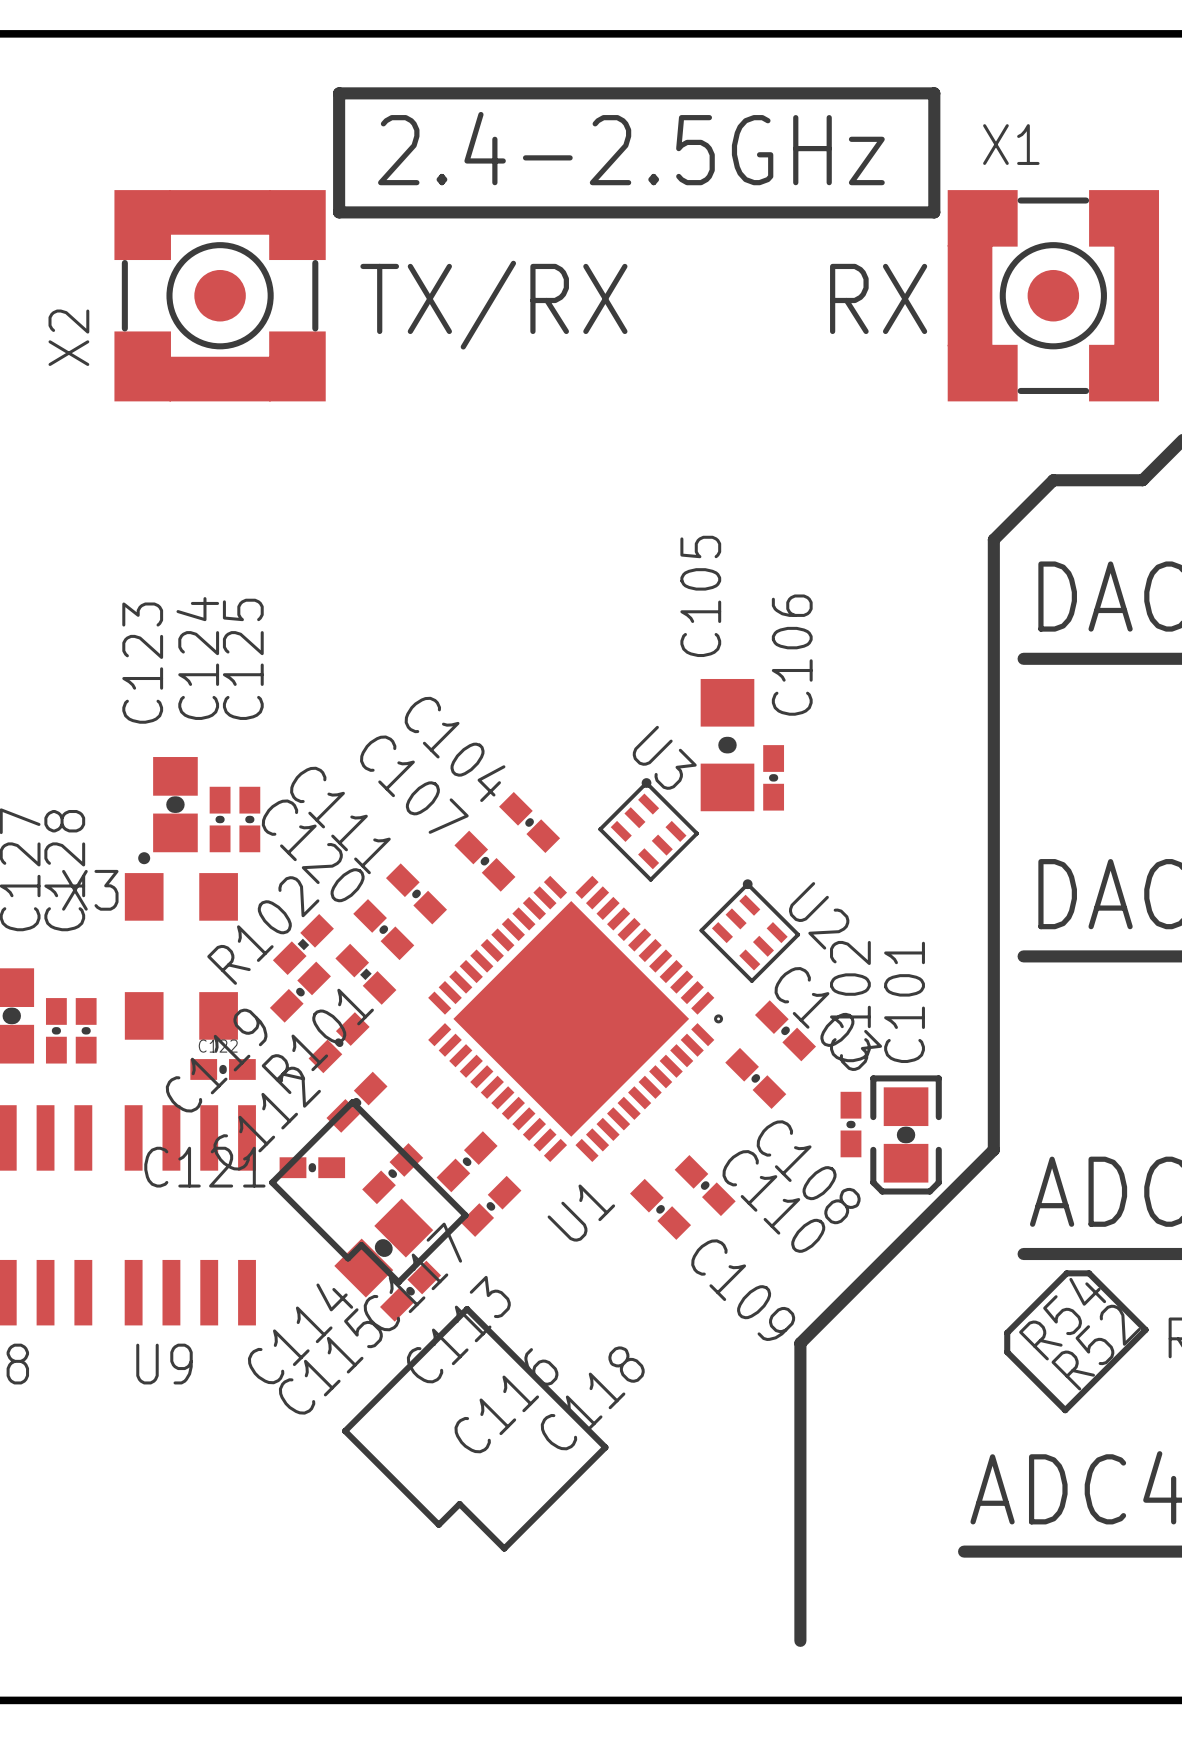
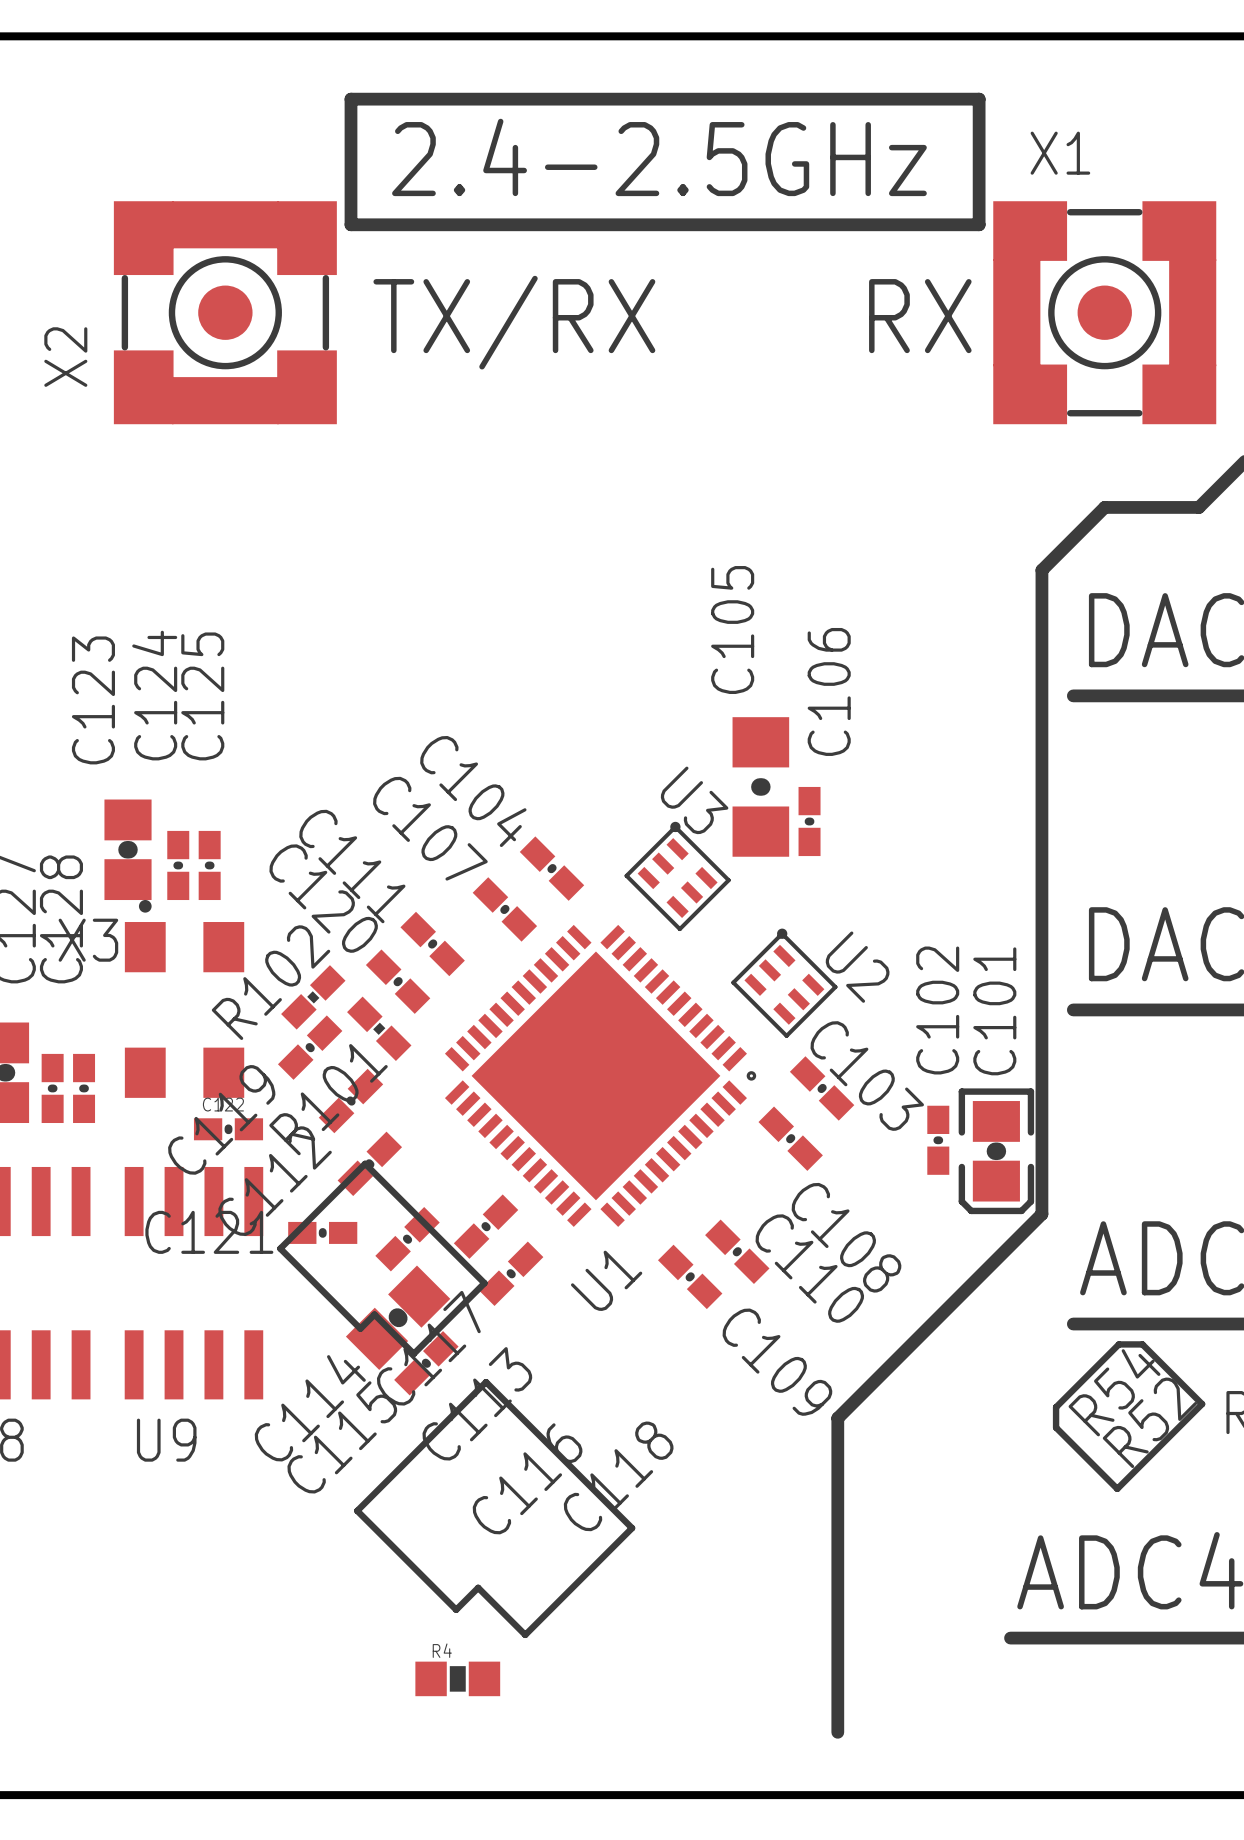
C123 position: (175, 804) -> (128, 849)
C124 position: (220, 819) -> (178, 865)
C125 position: (249, 819) -> (209, 865)
C102 position: (850, 1124) -> (938, 1140)
C101 position: (906, 1134) -> (996, 1151)
R4: none -> (457, 1678)

